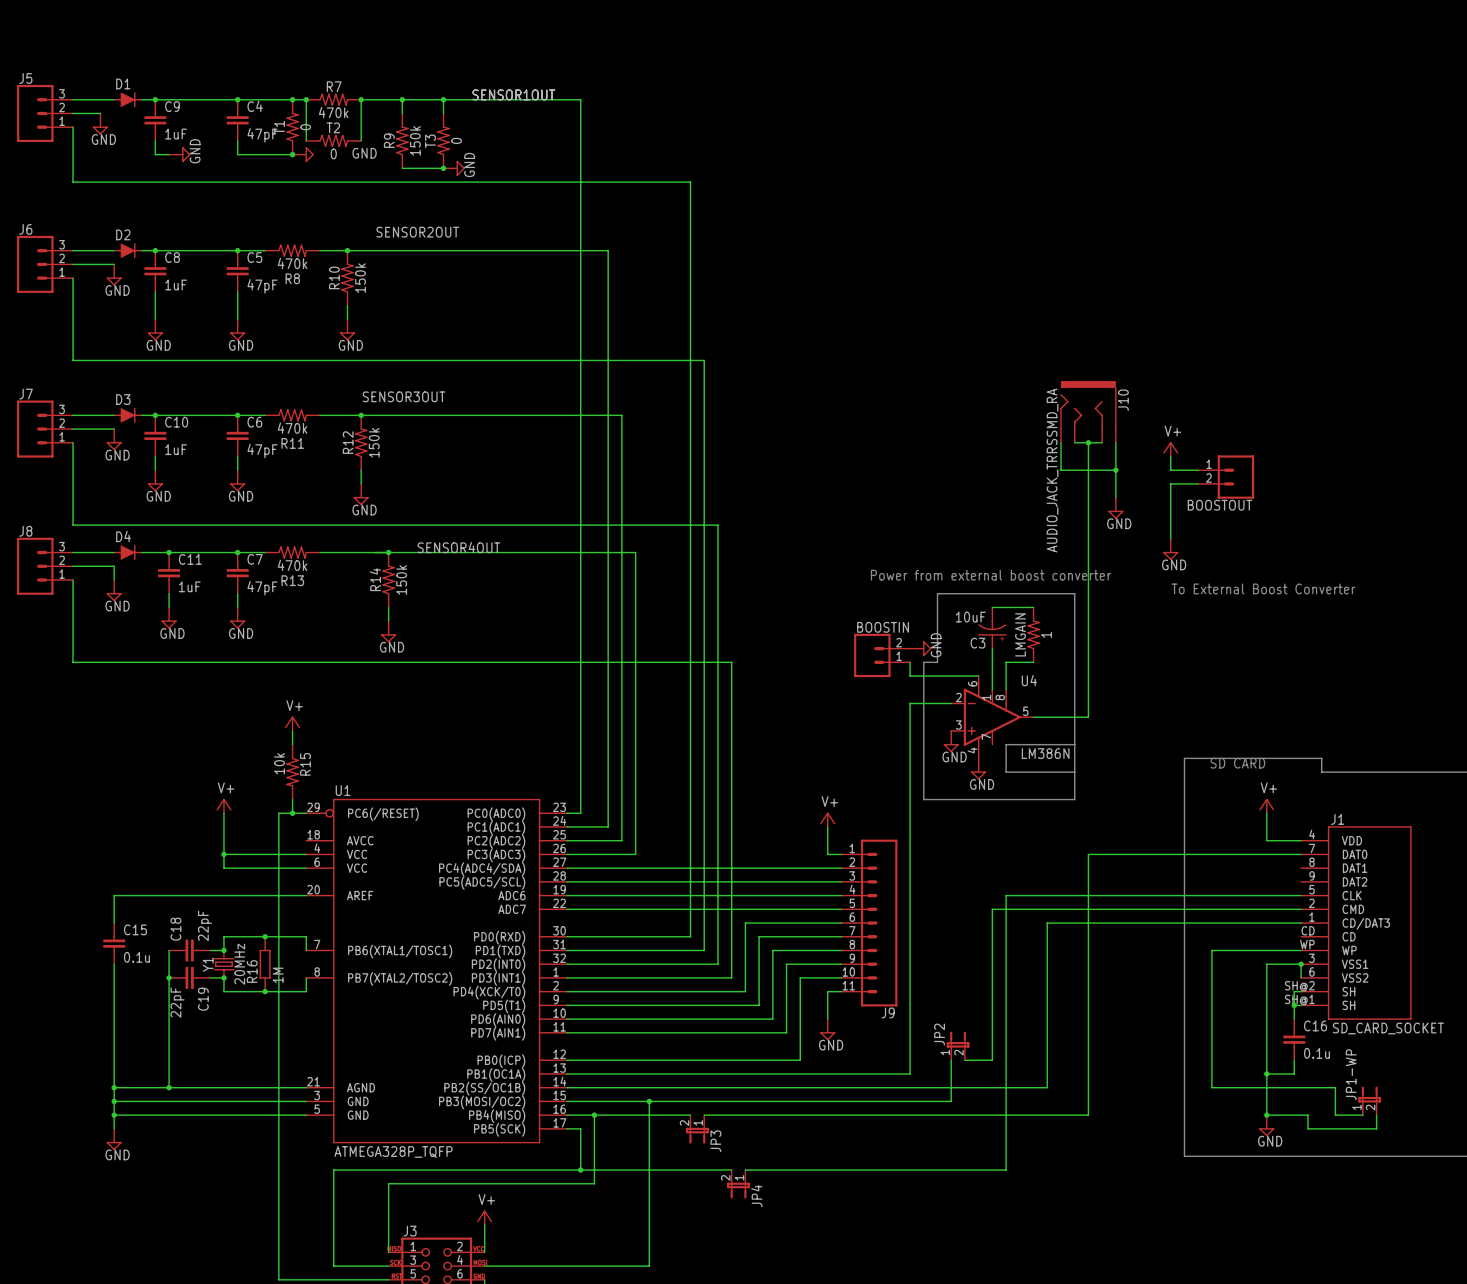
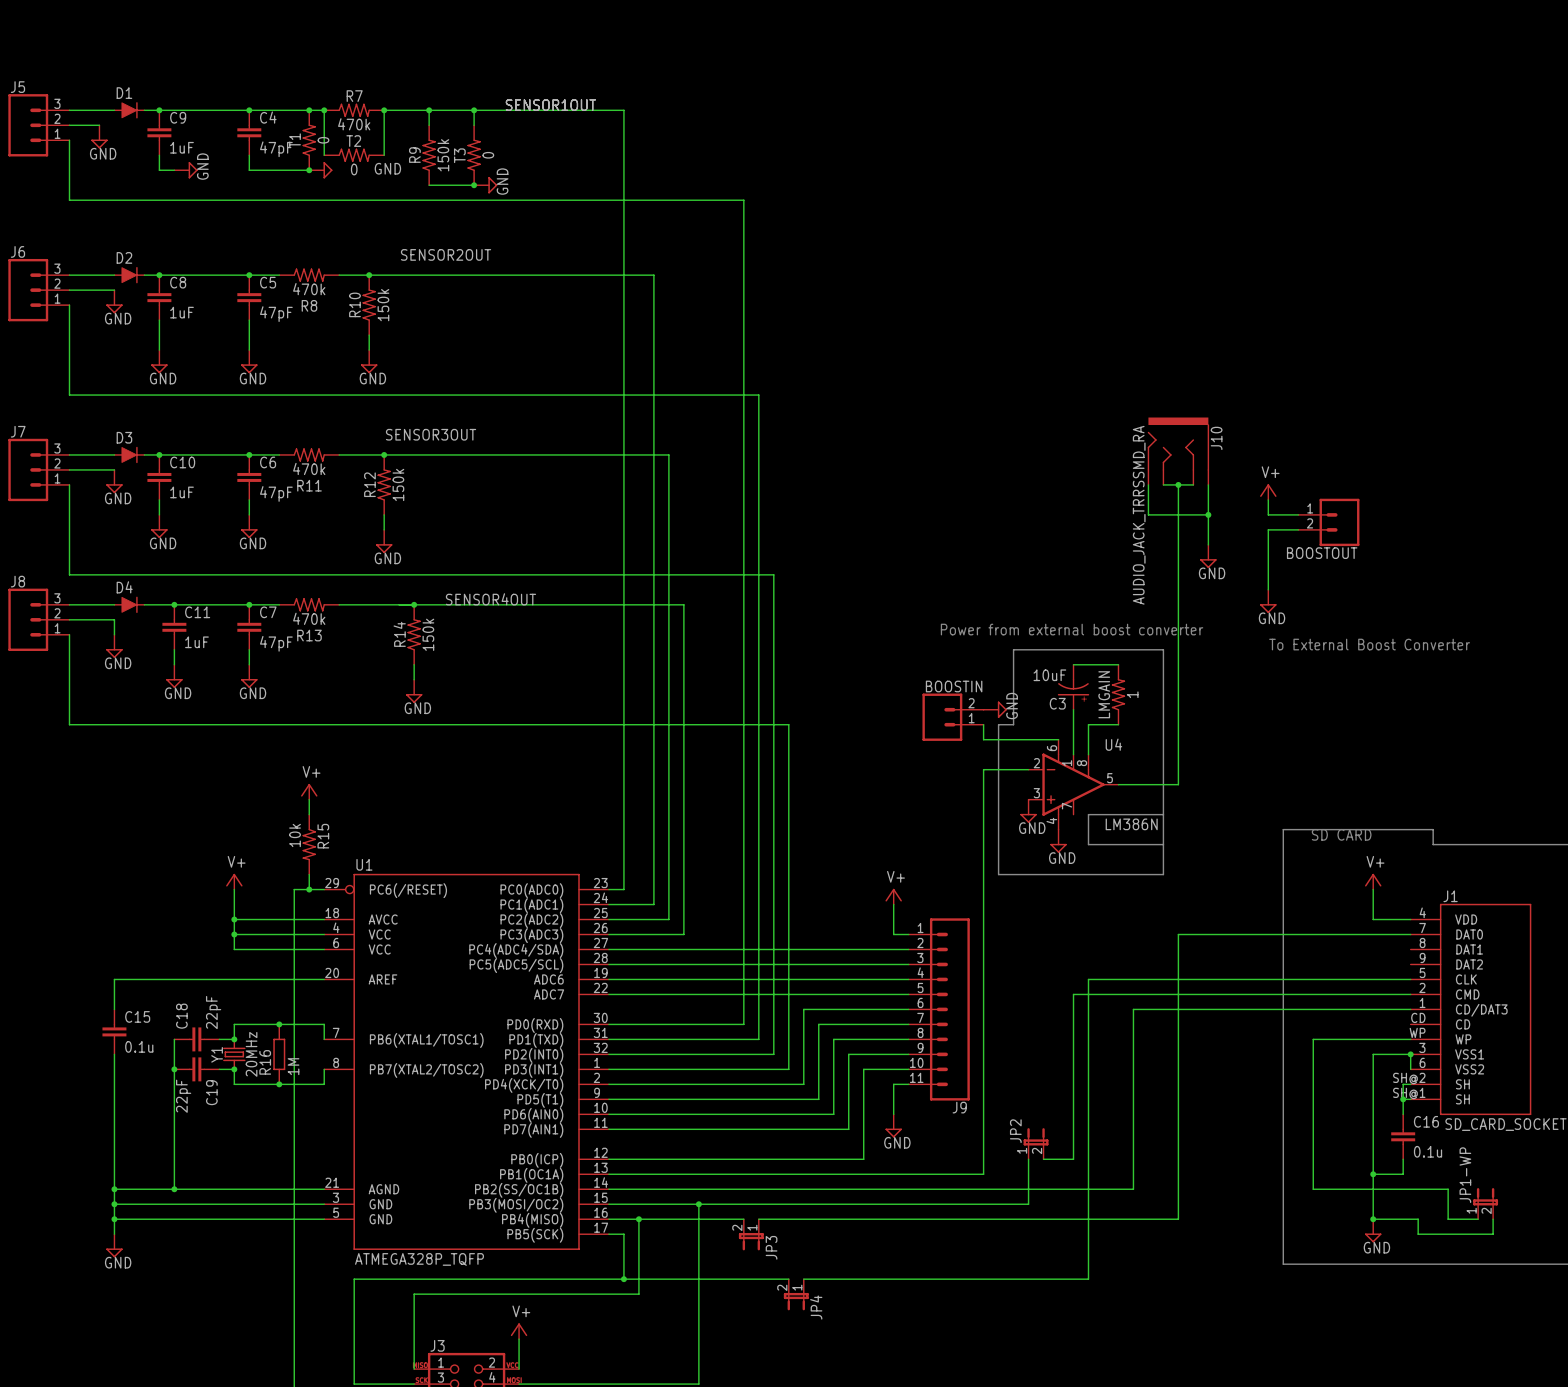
wire: none -> (234, 919) (324, 919)
junction: none -> (234, 919)

